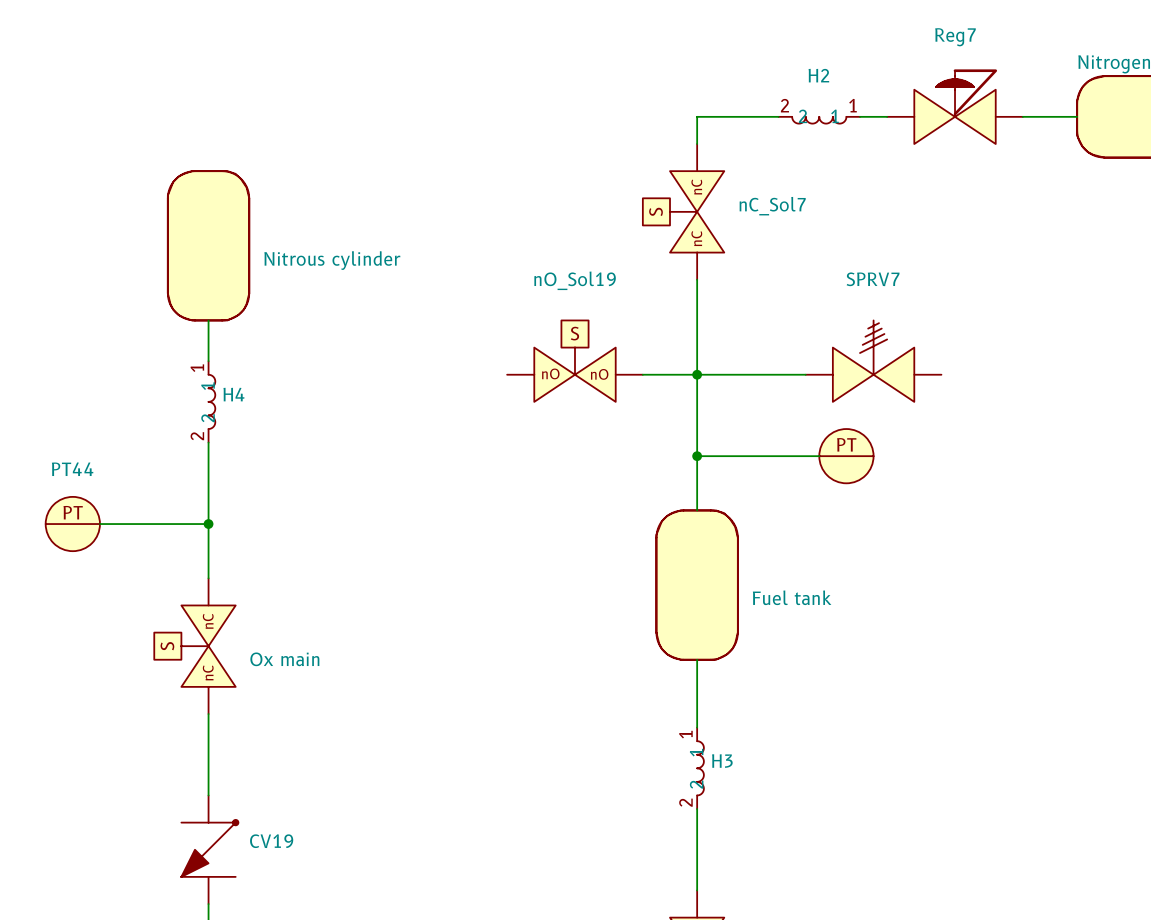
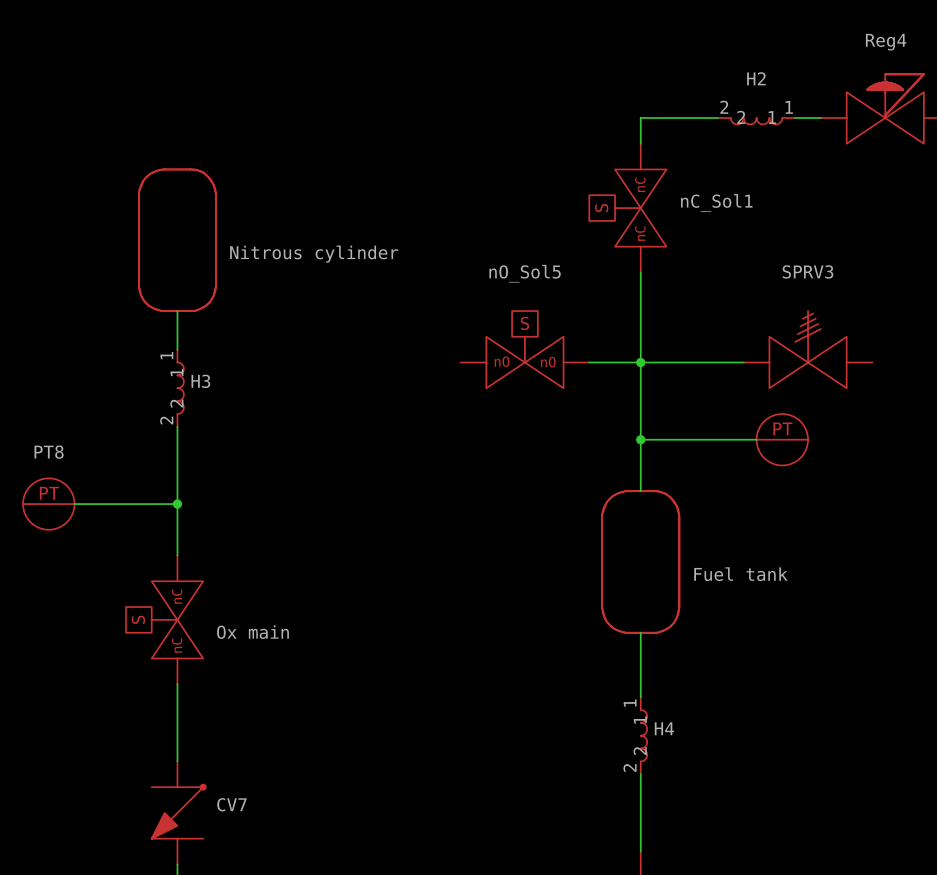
Reg7 name: Reg7 (955, 37) -> Reg4 (886, 42)
nC_Sol7 name: nC_Sol7 (772, 206) -> nC_Sol1 (716, 202)
SPRV7 name: SPRV7 (873, 279) -> SPRV3 (807, 271)
nO_Sol19 name: nO_Sol19 (575, 280) -> nO_Sol5 (525, 273)
H4 name: H4 (233, 394) -> H3 (200, 381)
PT44 name: PT44 (72, 469) -> PT8 (49, 452)
H3 name: H3 (722, 761) -> H4 (664, 728)
CV19 name: CV19 (271, 841) -> CV7 (231, 804)

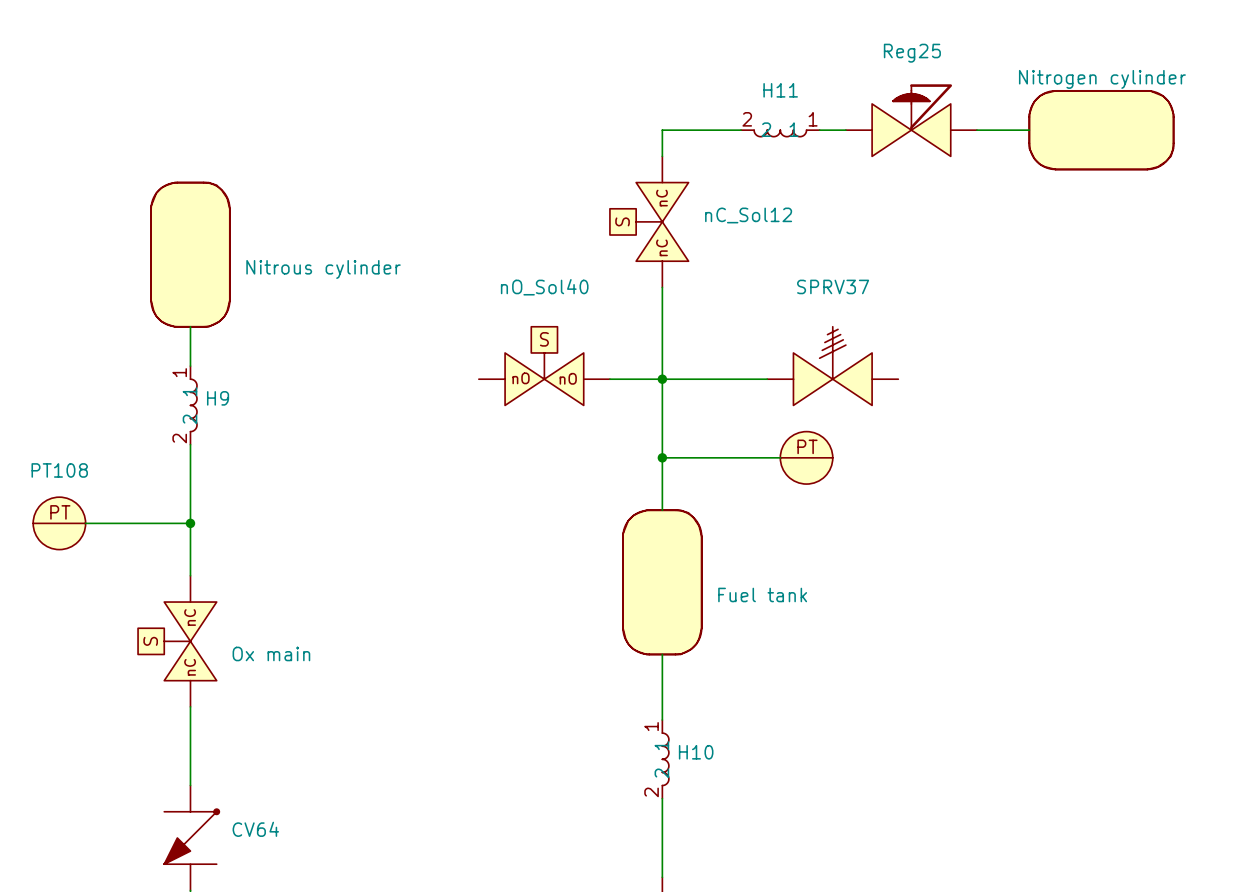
Reg4 name: Reg4 (886, 42) -> Reg25 (912, 53)
H2 name: H2 (756, 78) -> H11 (780, 90)
nC_Sol1 name: nC_Sol1 (716, 202) -> nC_Sol12 (748, 215)
SPRV3 name: SPRV3 (807, 271) -> SPRV37 (833, 286)
nO_Sol5 name: nO_Sol5 (525, 273) -> nO_Sol40 (544, 287)
H3 name: H3 (200, 381) -> H9 (218, 398)
PT8 name: PT8 (49, 452) -> PT108 (59, 470)
H4 name: H4 (664, 728) -> H10 (696, 752)
CV7 name: CV7 (231, 804) -> CV64 (255, 829)

